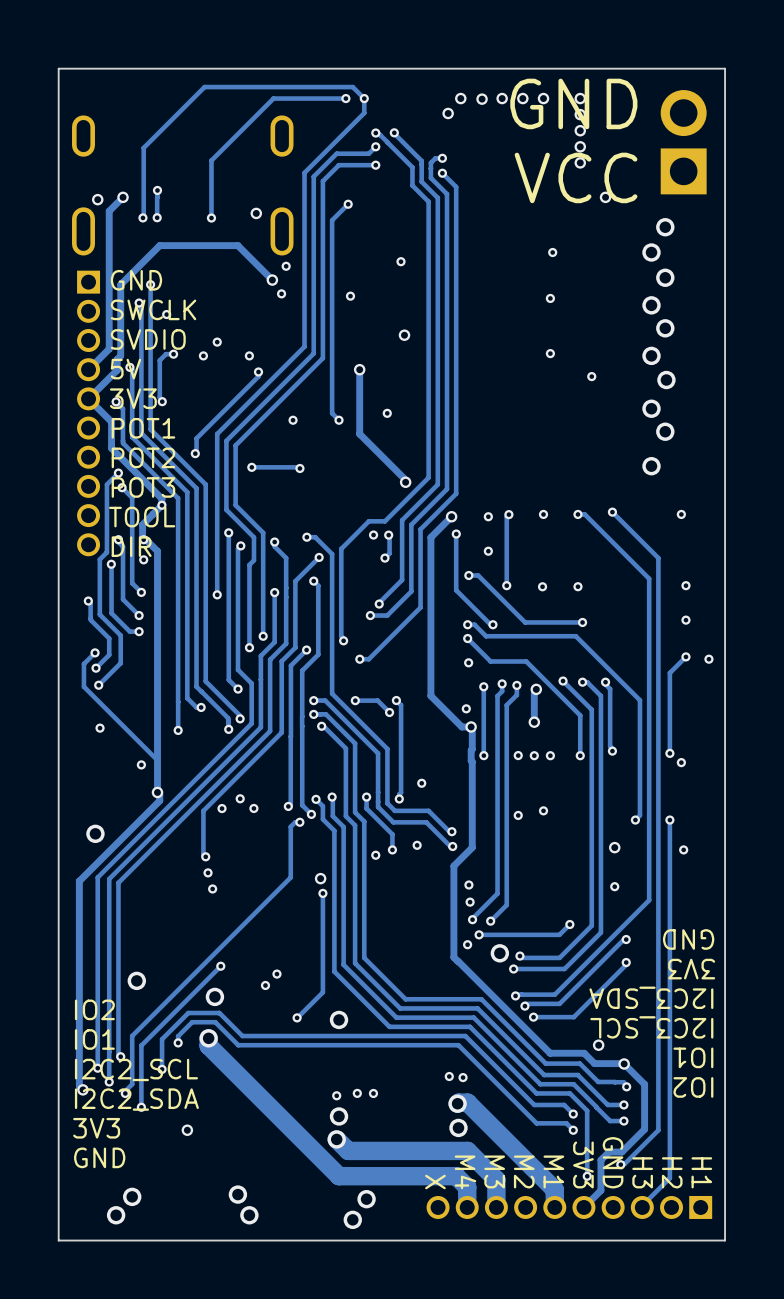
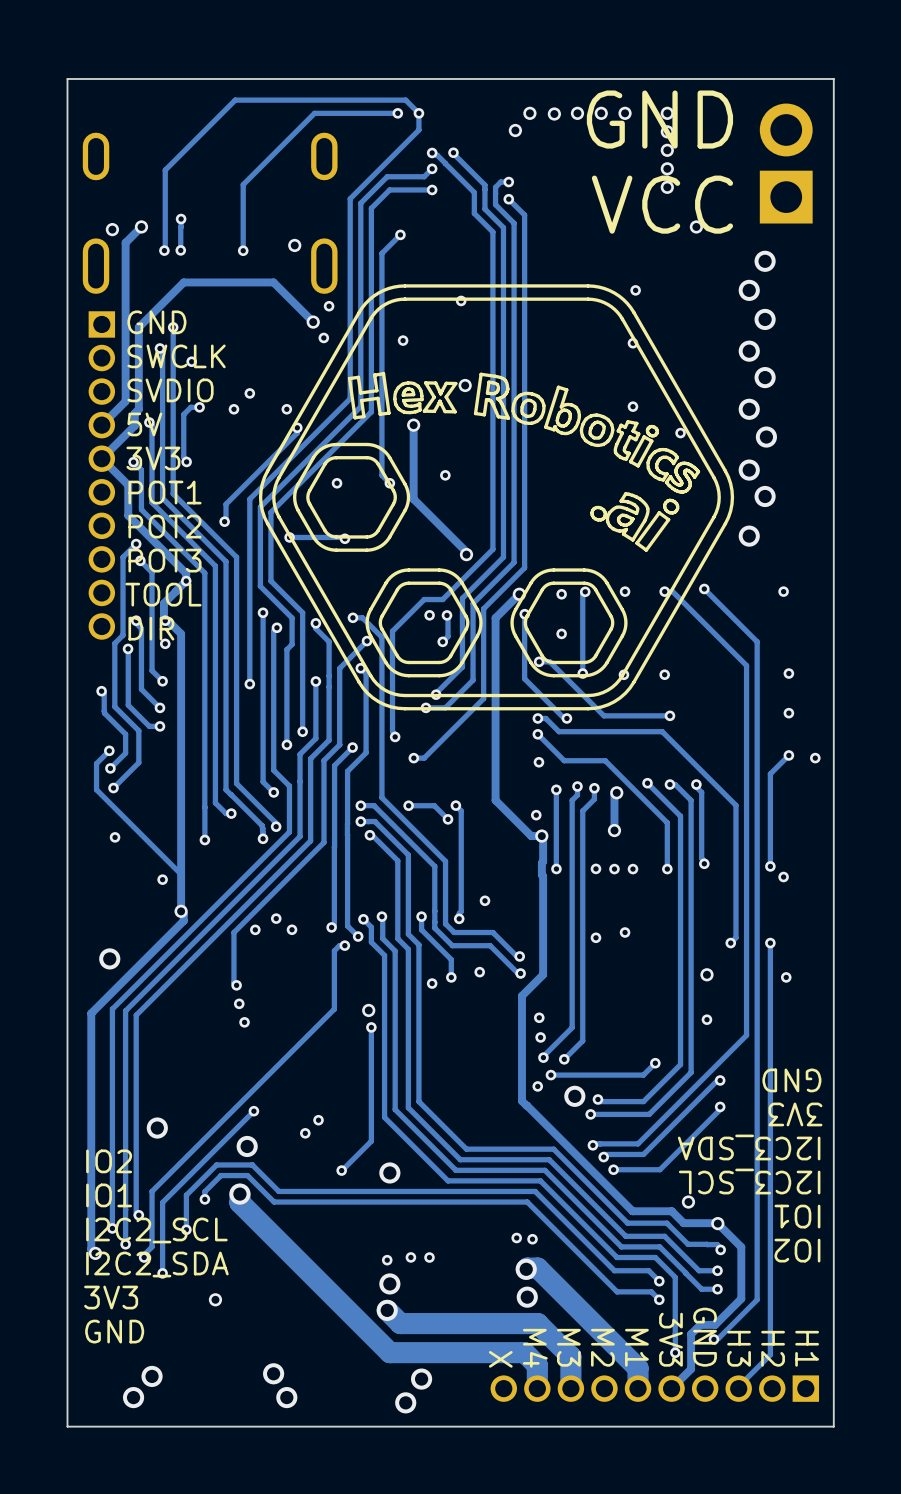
line: none -> (588, 285) (404, 285) (388, 288) (378, 293) (365, 303) (359, 312) (267, 470) (262, 483) (260, 497) (264, 517) (359, 682) (367, 693) (378, 701) (391, 706) (404, 708) (588, 708) (601, 706) (614, 701) (625, 693) (633, 682) (725, 523) (731, 504) (731, 490) (728, 477) (633, 312) (623, 299) (614, 293) (604, 288) (588, 285)
line: none -> (588, 299) (404, 299) (385, 304) (370, 318) (279, 477) (274, 493) (277, 513) (370, 675) (385, 690) (404, 695) (588, 695) (607, 690) (622, 675) (713, 517) (719, 497) (716, 482) (622, 318) (607, 304) (588, 299)
line: none -> (383, 373) (374, 375) (376, 390) (360, 392) (358, 377) (349, 378) (355, 417) (363, 416) (361, 400) (377, 398) (380, 414) (389, 413) (383, 373)
line: none -> (481, 374) (475, 413) (484, 414) (486, 399) (488, 400) (492, 402) (498, 416) (508, 418) (497, 398) (506, 392) (506, 381) (499, 377) (481, 374)
line: none -> (408, 382) (402, 384) (397, 389) (395, 402) (402, 411) (414, 411) (420, 409) (419, 403) (408, 405) (403, 400) (422, 399) (421, 392) (416, 385) (408, 382)
line: none -> (488, 382) (497, 384) (498, 388) (496, 392) (487, 393) (488, 382)
line: none -> (558, 387) (566, 389) (561, 406) (571, 405) (576, 407) (579, 413) (576, 426) (567, 433) (559, 431) (555, 426) (554, 429) (545, 427) (558, 387)
line: none -> (408, 388) (412, 390) (413, 394) (403, 395) (404, 390) (408, 388)
line: none -> (440, 393) (446, 383) (455, 383) (446, 397) (455, 411) (445, 411) (440, 401)
line: none -> (440, 393) (435, 383) (425, 382) (434, 397) (424, 411) (434, 411) (439, 401)
line: none -> (525, 393) (537, 396) (543, 404) (541, 417) (532, 423) (519, 420) (513, 411) (515, 399) (525, 393)
line: none -> (527, 400) (523, 403) (521, 409) (522, 413) (526, 416) (532, 414) (535, 406) (533, 402) (527, 400)
line: none -> (564, 410) (559, 412) (557, 420) (558, 424) (562, 426) (568, 422) (570, 416) (568, 411) (564, 410)
line: none -> (596, 415) (585, 419) (581, 431) (586, 441) (598, 445) (608, 440) (612, 429) (608, 419) (596, 415)
line: none -> (627, 421) (625, 427) (621, 425) (618, 431) (622, 433) (615, 450) (618, 455) (626, 459) (629, 453) (624, 451) (625, 447) (630, 436) (635, 439) (638, 433) (633, 431) (636, 423) (627, 421)
line: none -> (597, 422) (603, 425) (603, 429) (600, 437) (594, 437) (590, 434) (590, 430) (592, 424) (597, 422)
line: none -> (652, 426) (657, 431) (652, 435) (648, 433) (647, 430) (652, 426)
line: none -> (644, 436) (630, 461) (638, 465) (651, 441) (644, 436)
line: none -> (366, 444) (333, 444) (323, 448) (314, 455) (296, 487) (294, 497) (296, 507) (314, 539) (325, 547) (336, 550) (369, 550) (377, 547) (388, 539) (406, 508) (408, 500) (407, 489) (389, 457) (380, 448) (366, 444)
line: none -> (665, 449) (677, 457) (673, 463) (666, 457) (658, 461) (657, 470) (667, 473) (663, 479) (651, 473) (648, 463) (654, 452) (665, 449)
line: none -> (366, 457) (329, 459) (309, 491) (309, 502) (325, 531) (330, 535) (366, 536) (373, 535) (394, 502) (394, 492) (378, 464) (373, 459) (366, 457)
line: none -> (684, 463) (690, 465) (698, 471) (694, 477) (689, 471) (684, 471) (690, 485) (685, 491) (680, 491) (666, 482) (670, 476) (675, 483) (681, 484) (676, 470) (679, 464) (684, 463)
line: none -> (625, 493) (639, 498) (647, 509) (644, 520) (632, 539) (623, 534) (626, 529) (615, 530) (607, 521) (609, 512) (616, 507) (636, 513) (637, 508) (634, 504) (621, 501) (625, 493)
line: none -> (669, 500) (674, 501) (677, 506) (676, 510) (672, 513) (667, 511) (664, 507) (665, 502) (669, 500)
line: none -> (598, 507) (605, 512) (604, 516) (600, 519) (595, 519) (592, 515) (593, 509) (598, 507)
line: none -> (659, 512) (668, 519) (646, 550) (636, 543) (659, 512)
line: none -> (622, 515) (618, 520) (623, 524) (628, 524) (633, 519) (622, 515)
line: none -> (439, 570) (405, 570) (395, 573) (387, 580) (369, 612) (367, 622) (369, 633) (387, 665) (398, 673) (408, 675) (439, 675) (450, 673) (460, 664) (478, 632) (480, 616) (462, 583) (452, 573) (439, 570)
line: none -> (584, 570) (550, 570) (540, 573) (532, 580) (514, 612) (512, 622) (514, 632) (532, 665) (543, 673) (553, 675) (584, 675) (594, 673) (605, 664) (623, 633) (625, 625) (624, 614) (607, 583) (597, 573) (584, 570)
line: none -> (439, 583) (402, 584) (381, 617) (381, 628) (398, 657) (403, 661) (439, 662) (445, 660) (466, 628) (466, 617) (450, 589) (445, 584) (439, 583)
line: none -> (584, 583) (547, 584) (526, 617) (527, 629) (543, 657) (548, 661) (584, 662) (590, 660) (611, 628) (611, 617) (595, 589) (590, 584) (584, 583)

